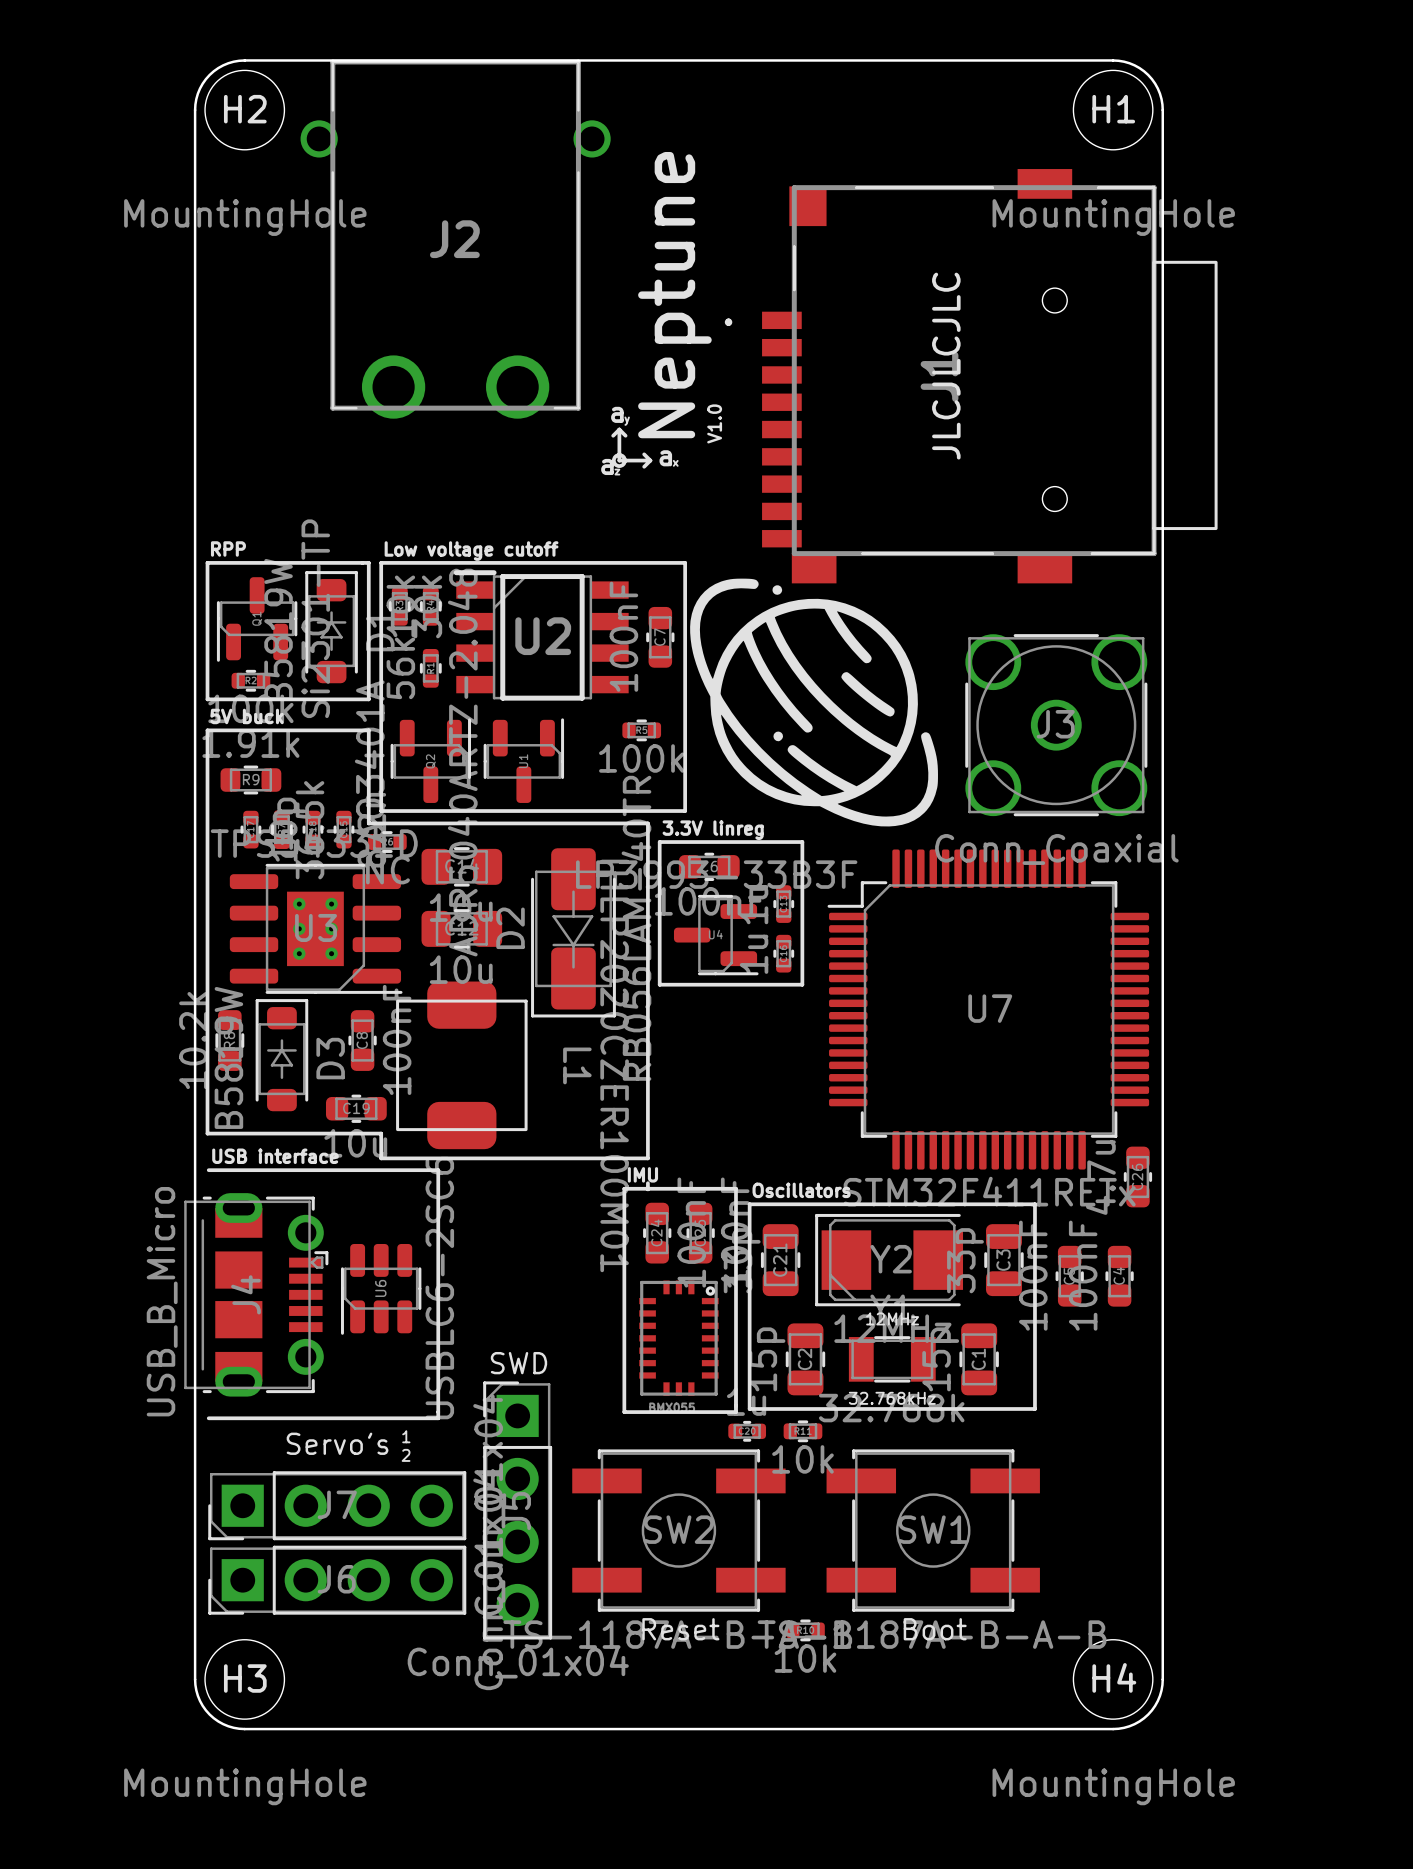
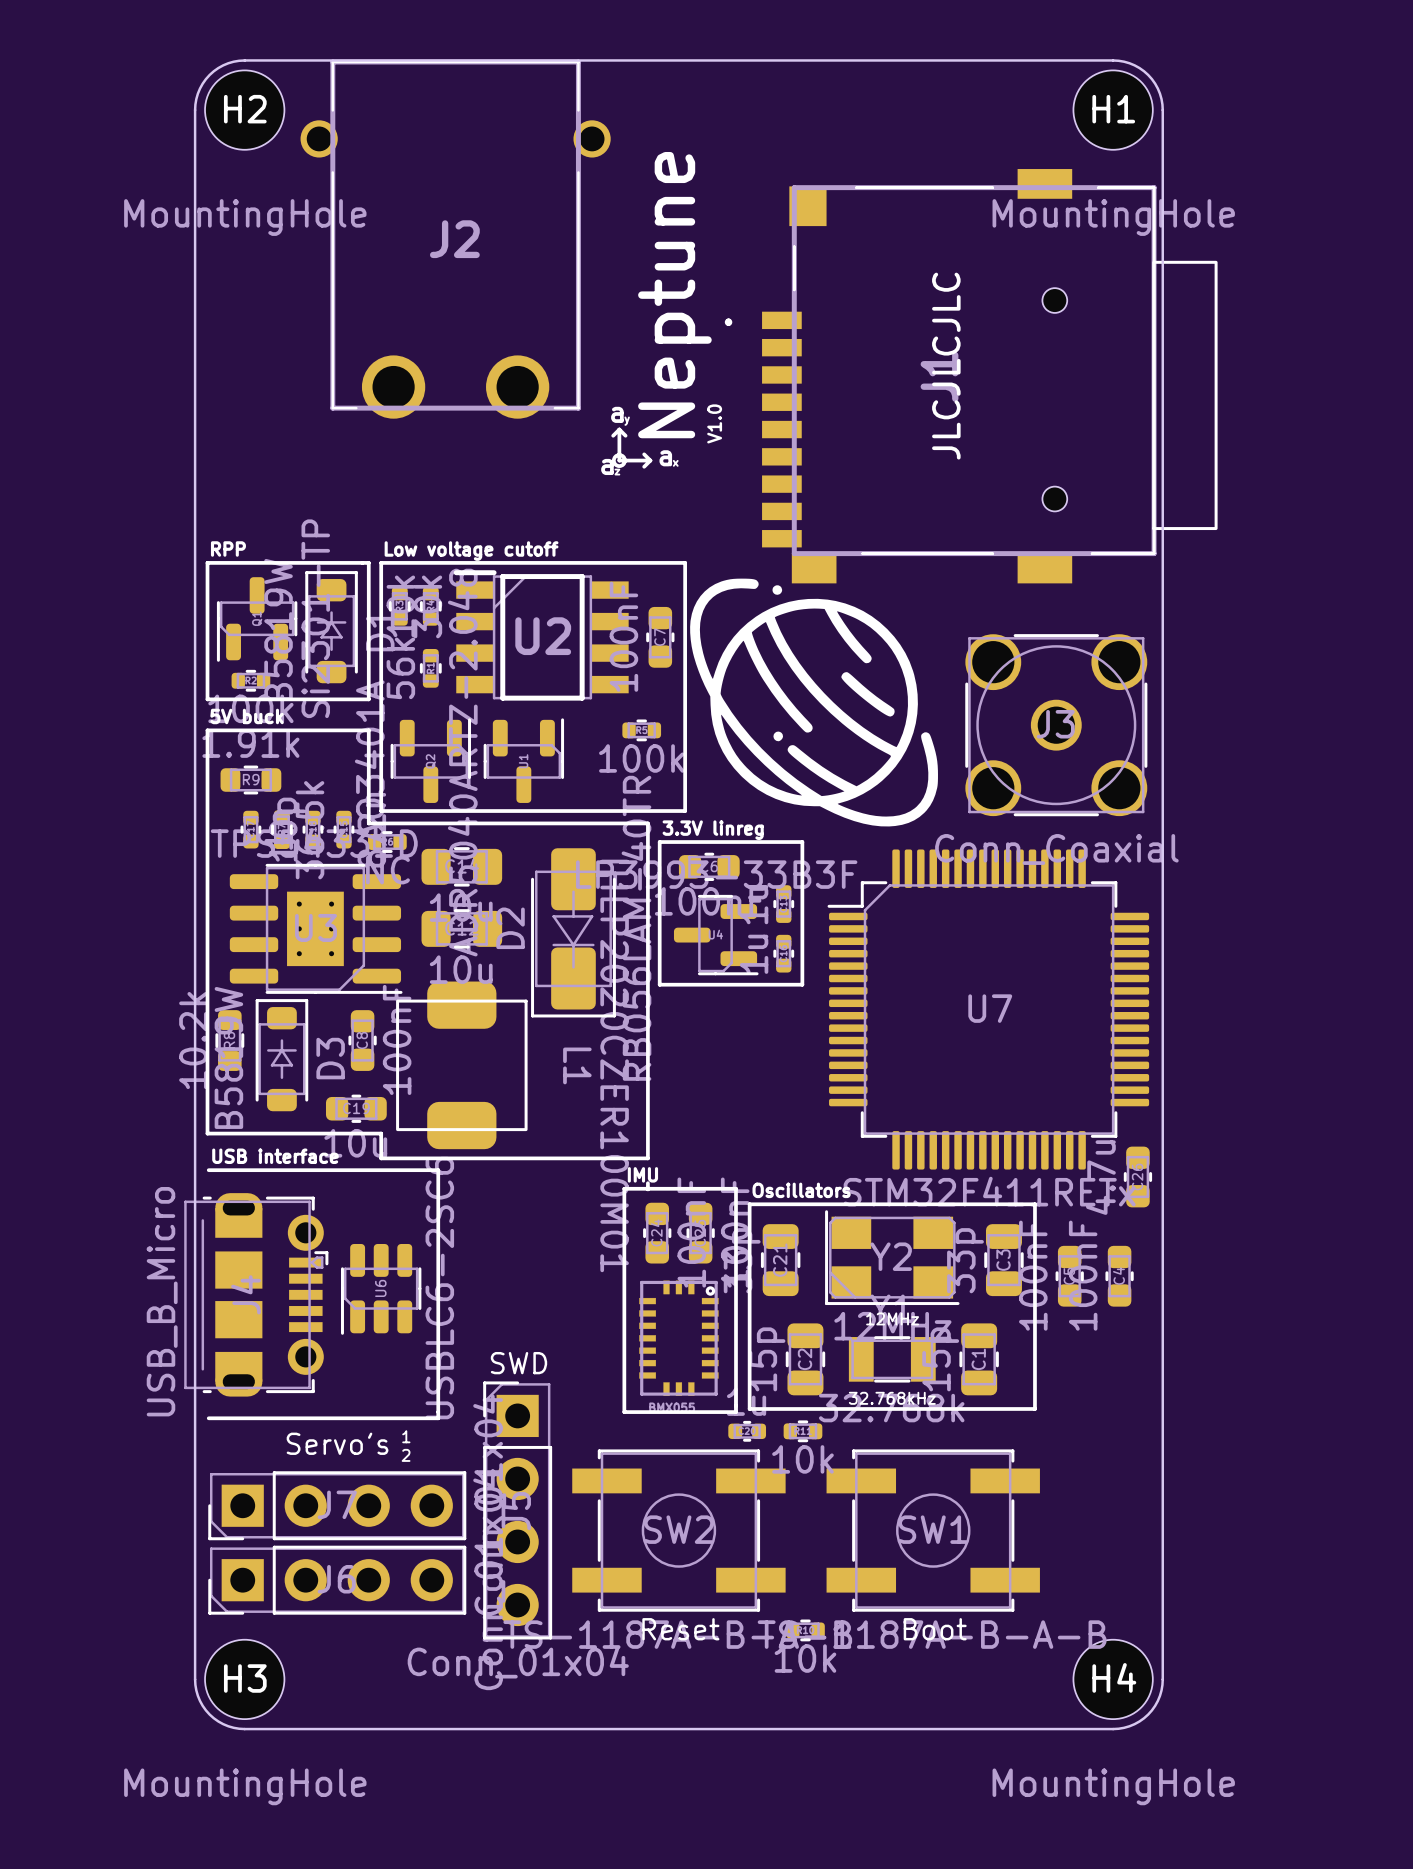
Y2 footprint: [815, 1213, 964, 1307] -> [825, 1210, 960, 1306]

